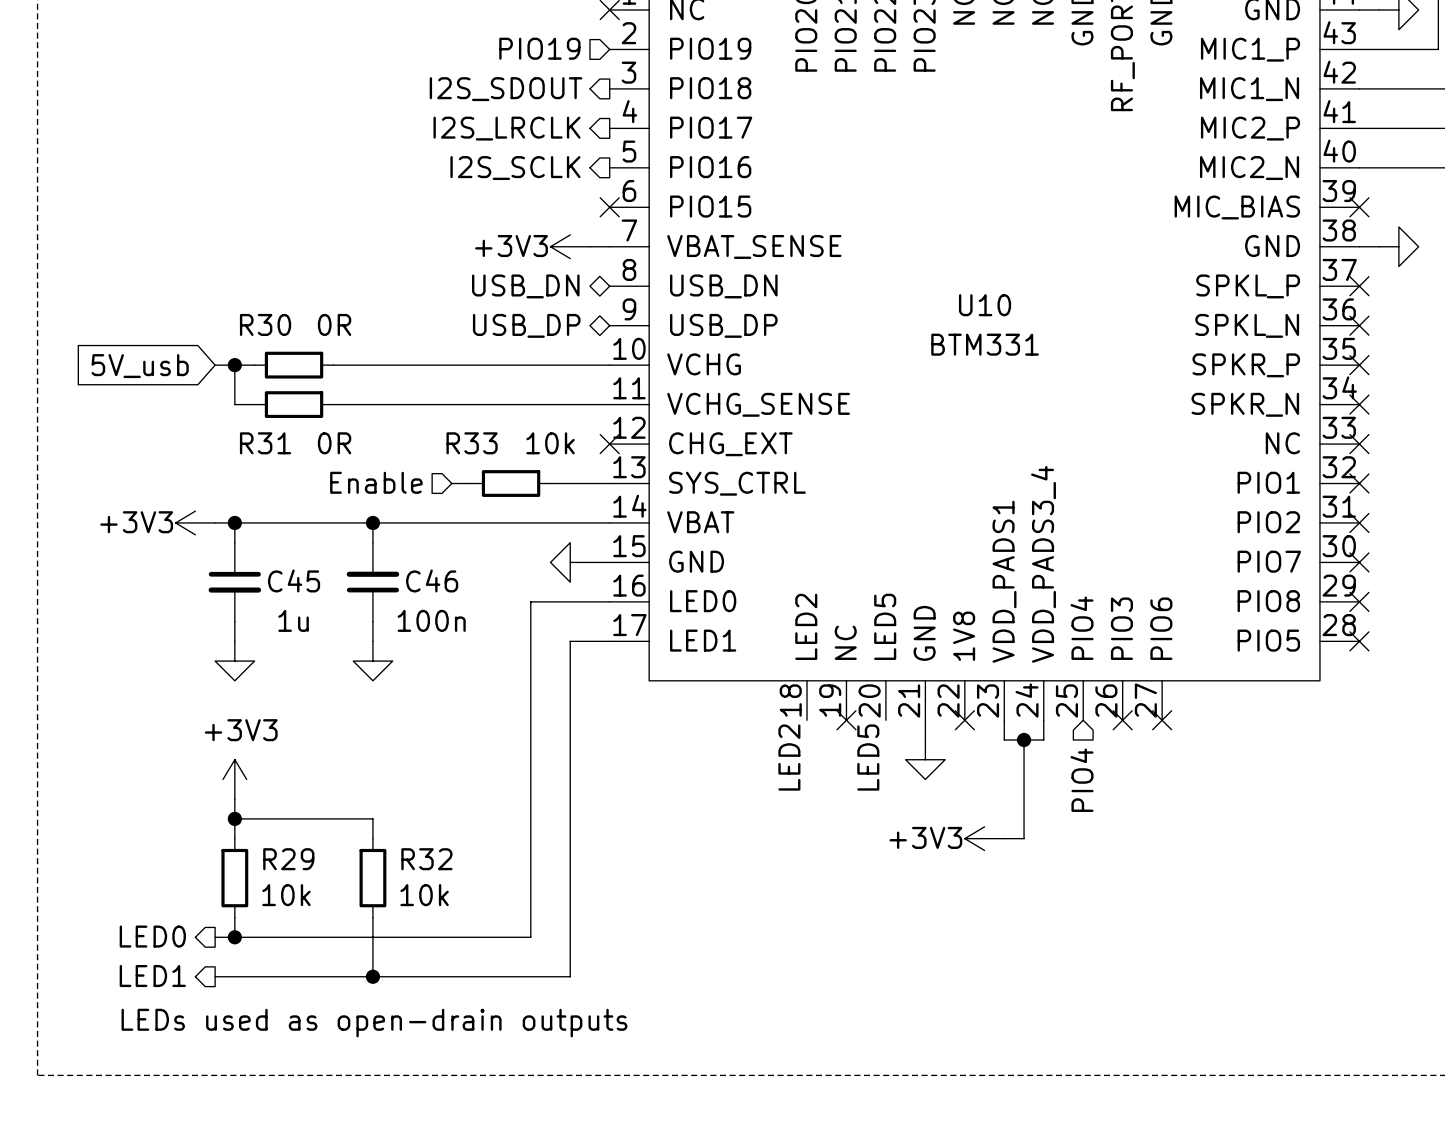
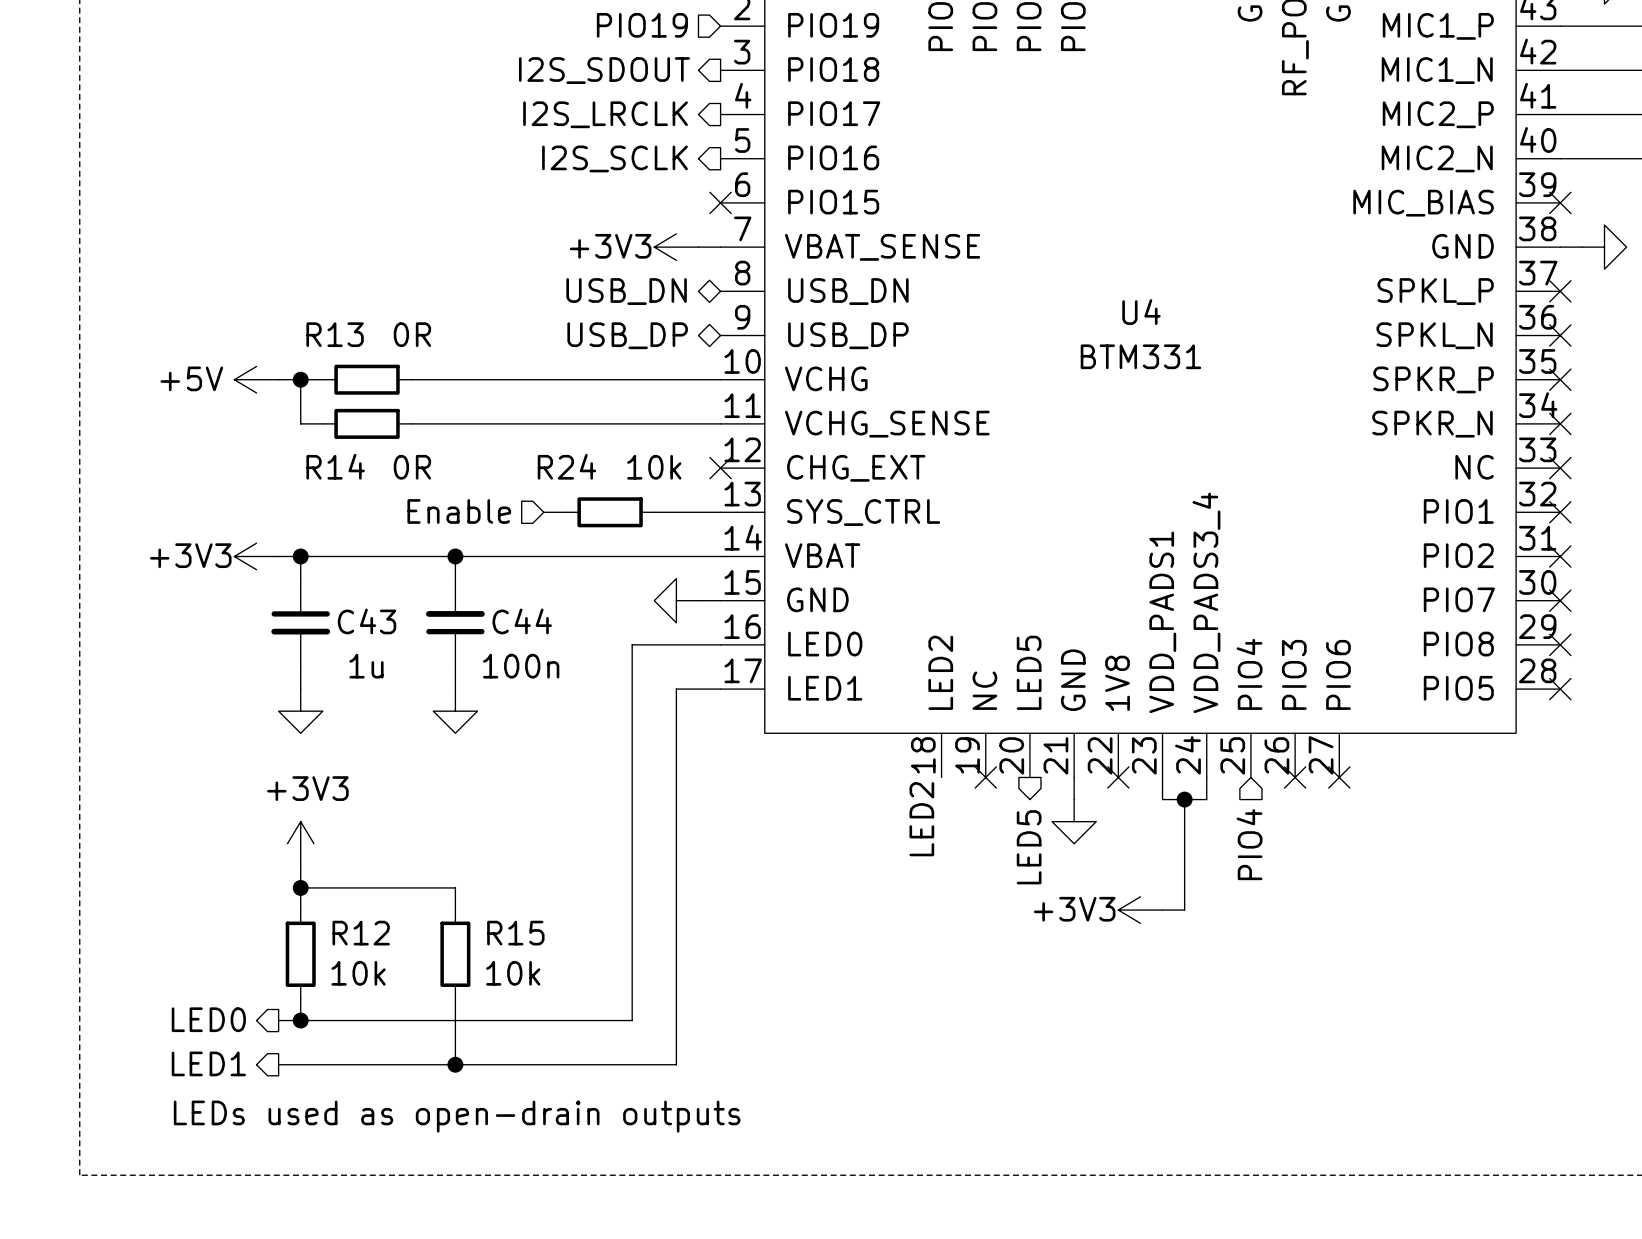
U10 name: U10 (985, 305) -> U4 (1141, 312)
R30 name: R30 (265, 324) -> R13 (335, 334)
power symbol: none -> +5V (256, 379)
global label: 5V_usb (140, 366) -> none
R31 name: R31 (265, 443) -> R14 (335, 466)
R33 name: R33 (472, 443) -> R24 (566, 466)
C45 name: C45 (294, 580) -> C43 (367, 621)
C46 name: C46 (432, 580) -> C44 (522, 621)
label: LED5 (868, 757) -> none
hierarchical label: none -> LED5 (1029, 847)
R29 name: R29 (288, 859) -> R12 (361, 933)
R32 name: R32 (426, 859) -> R15 (515, 933)

